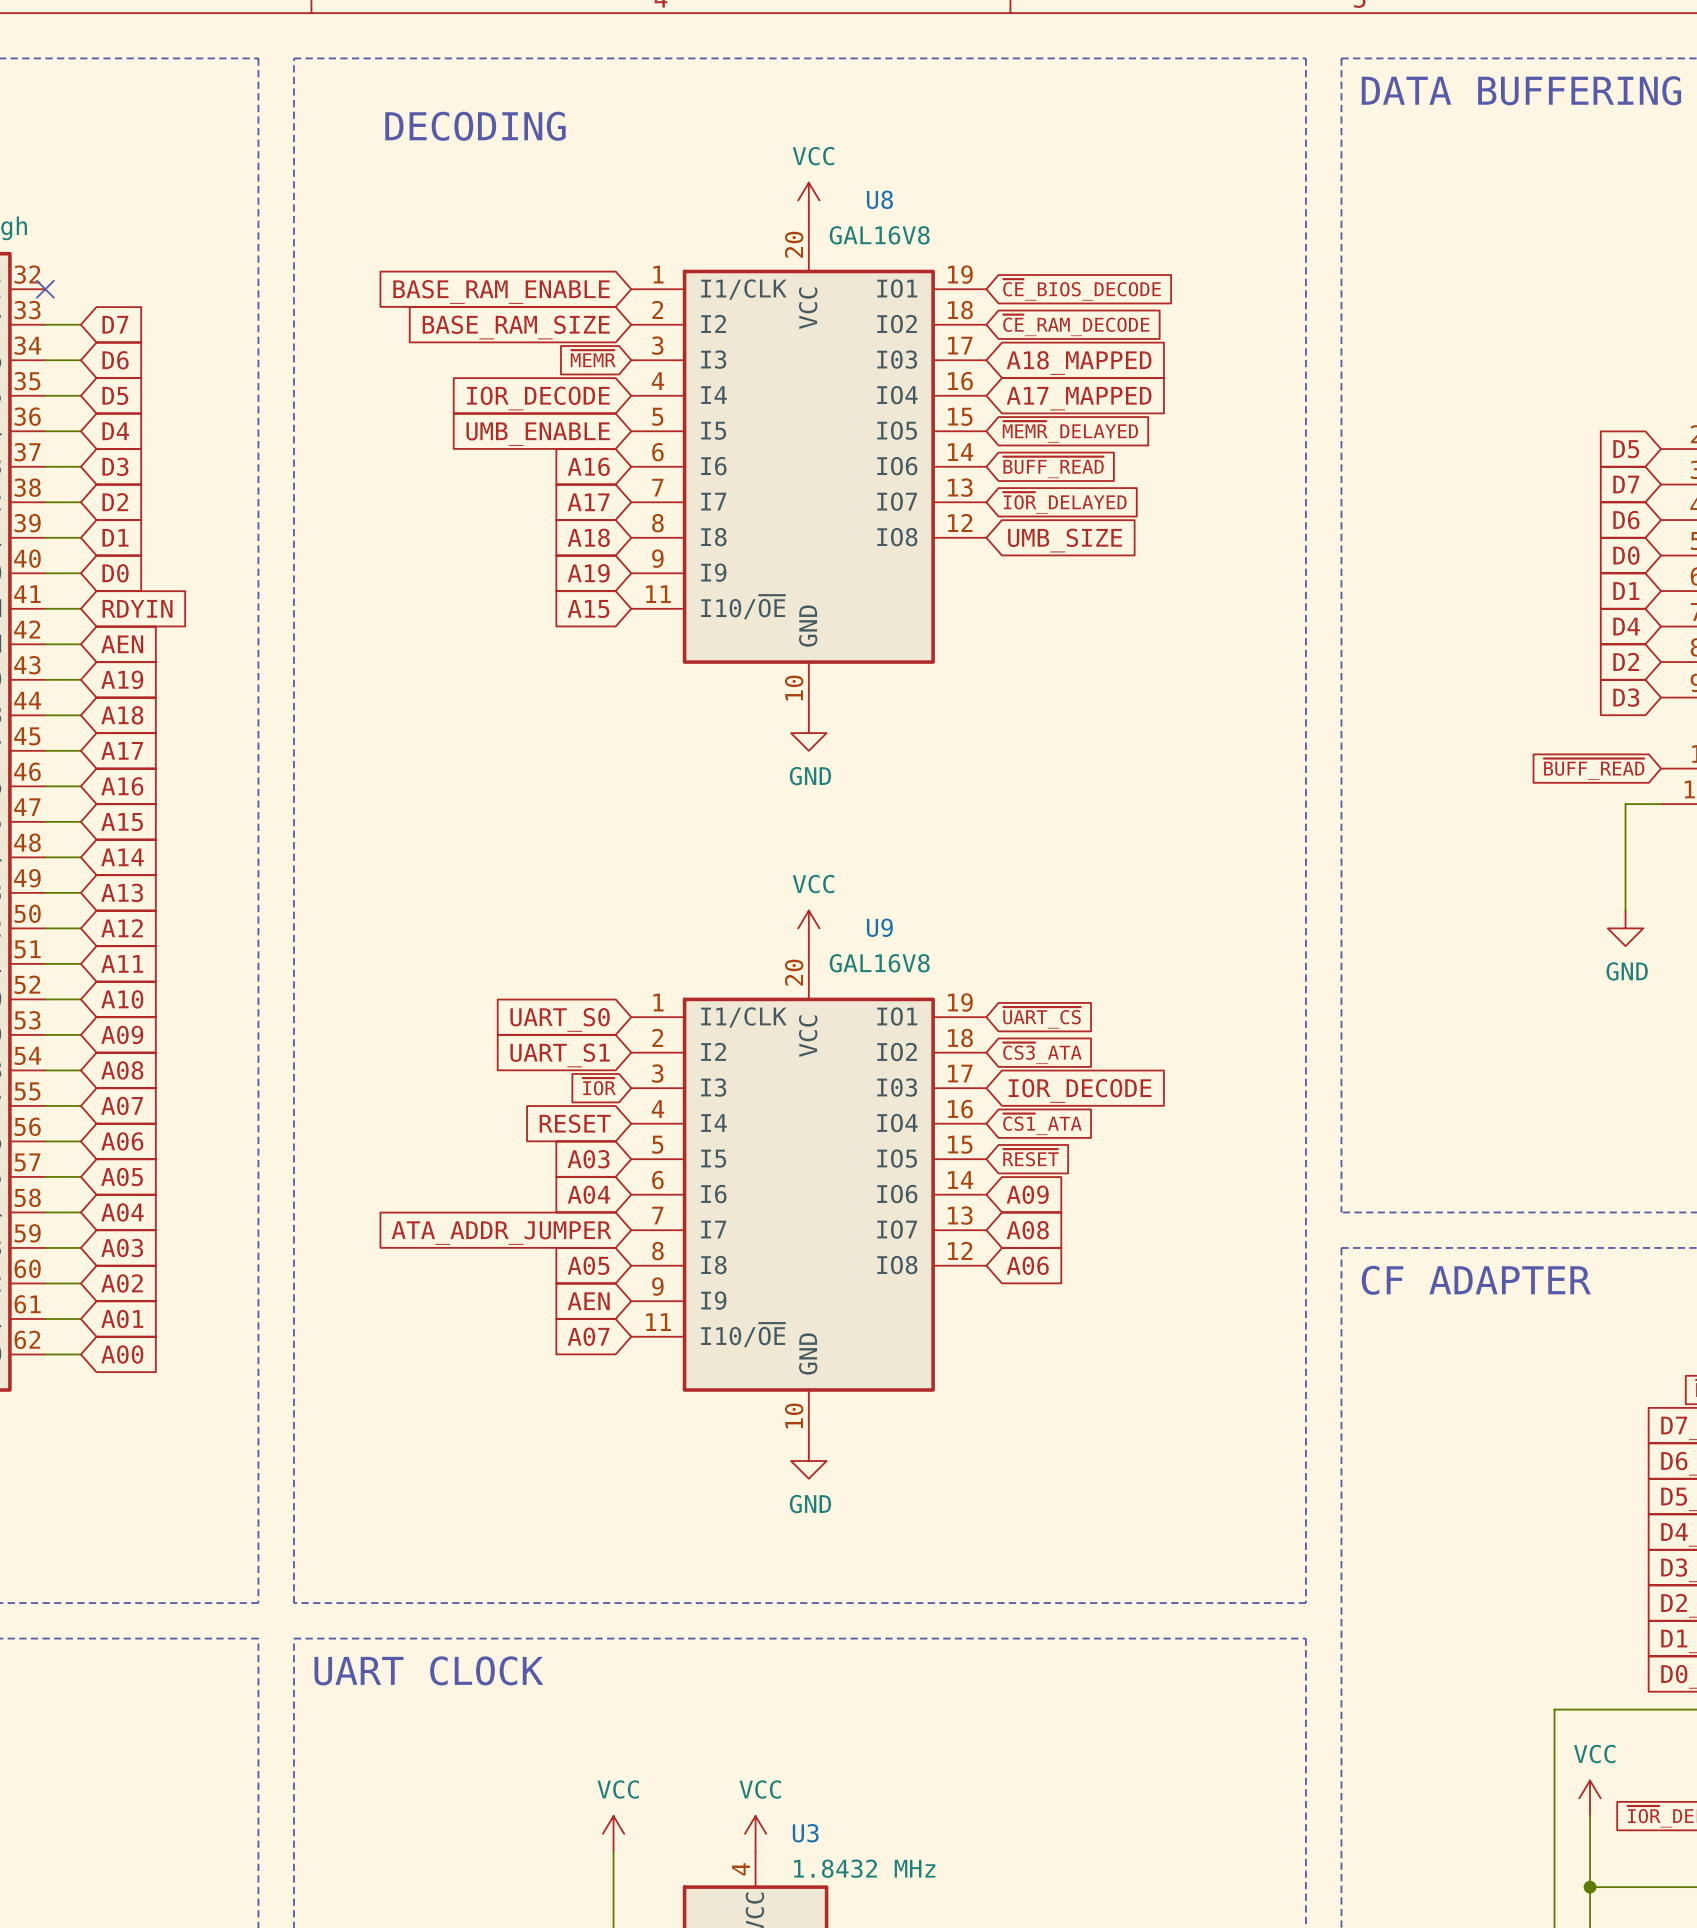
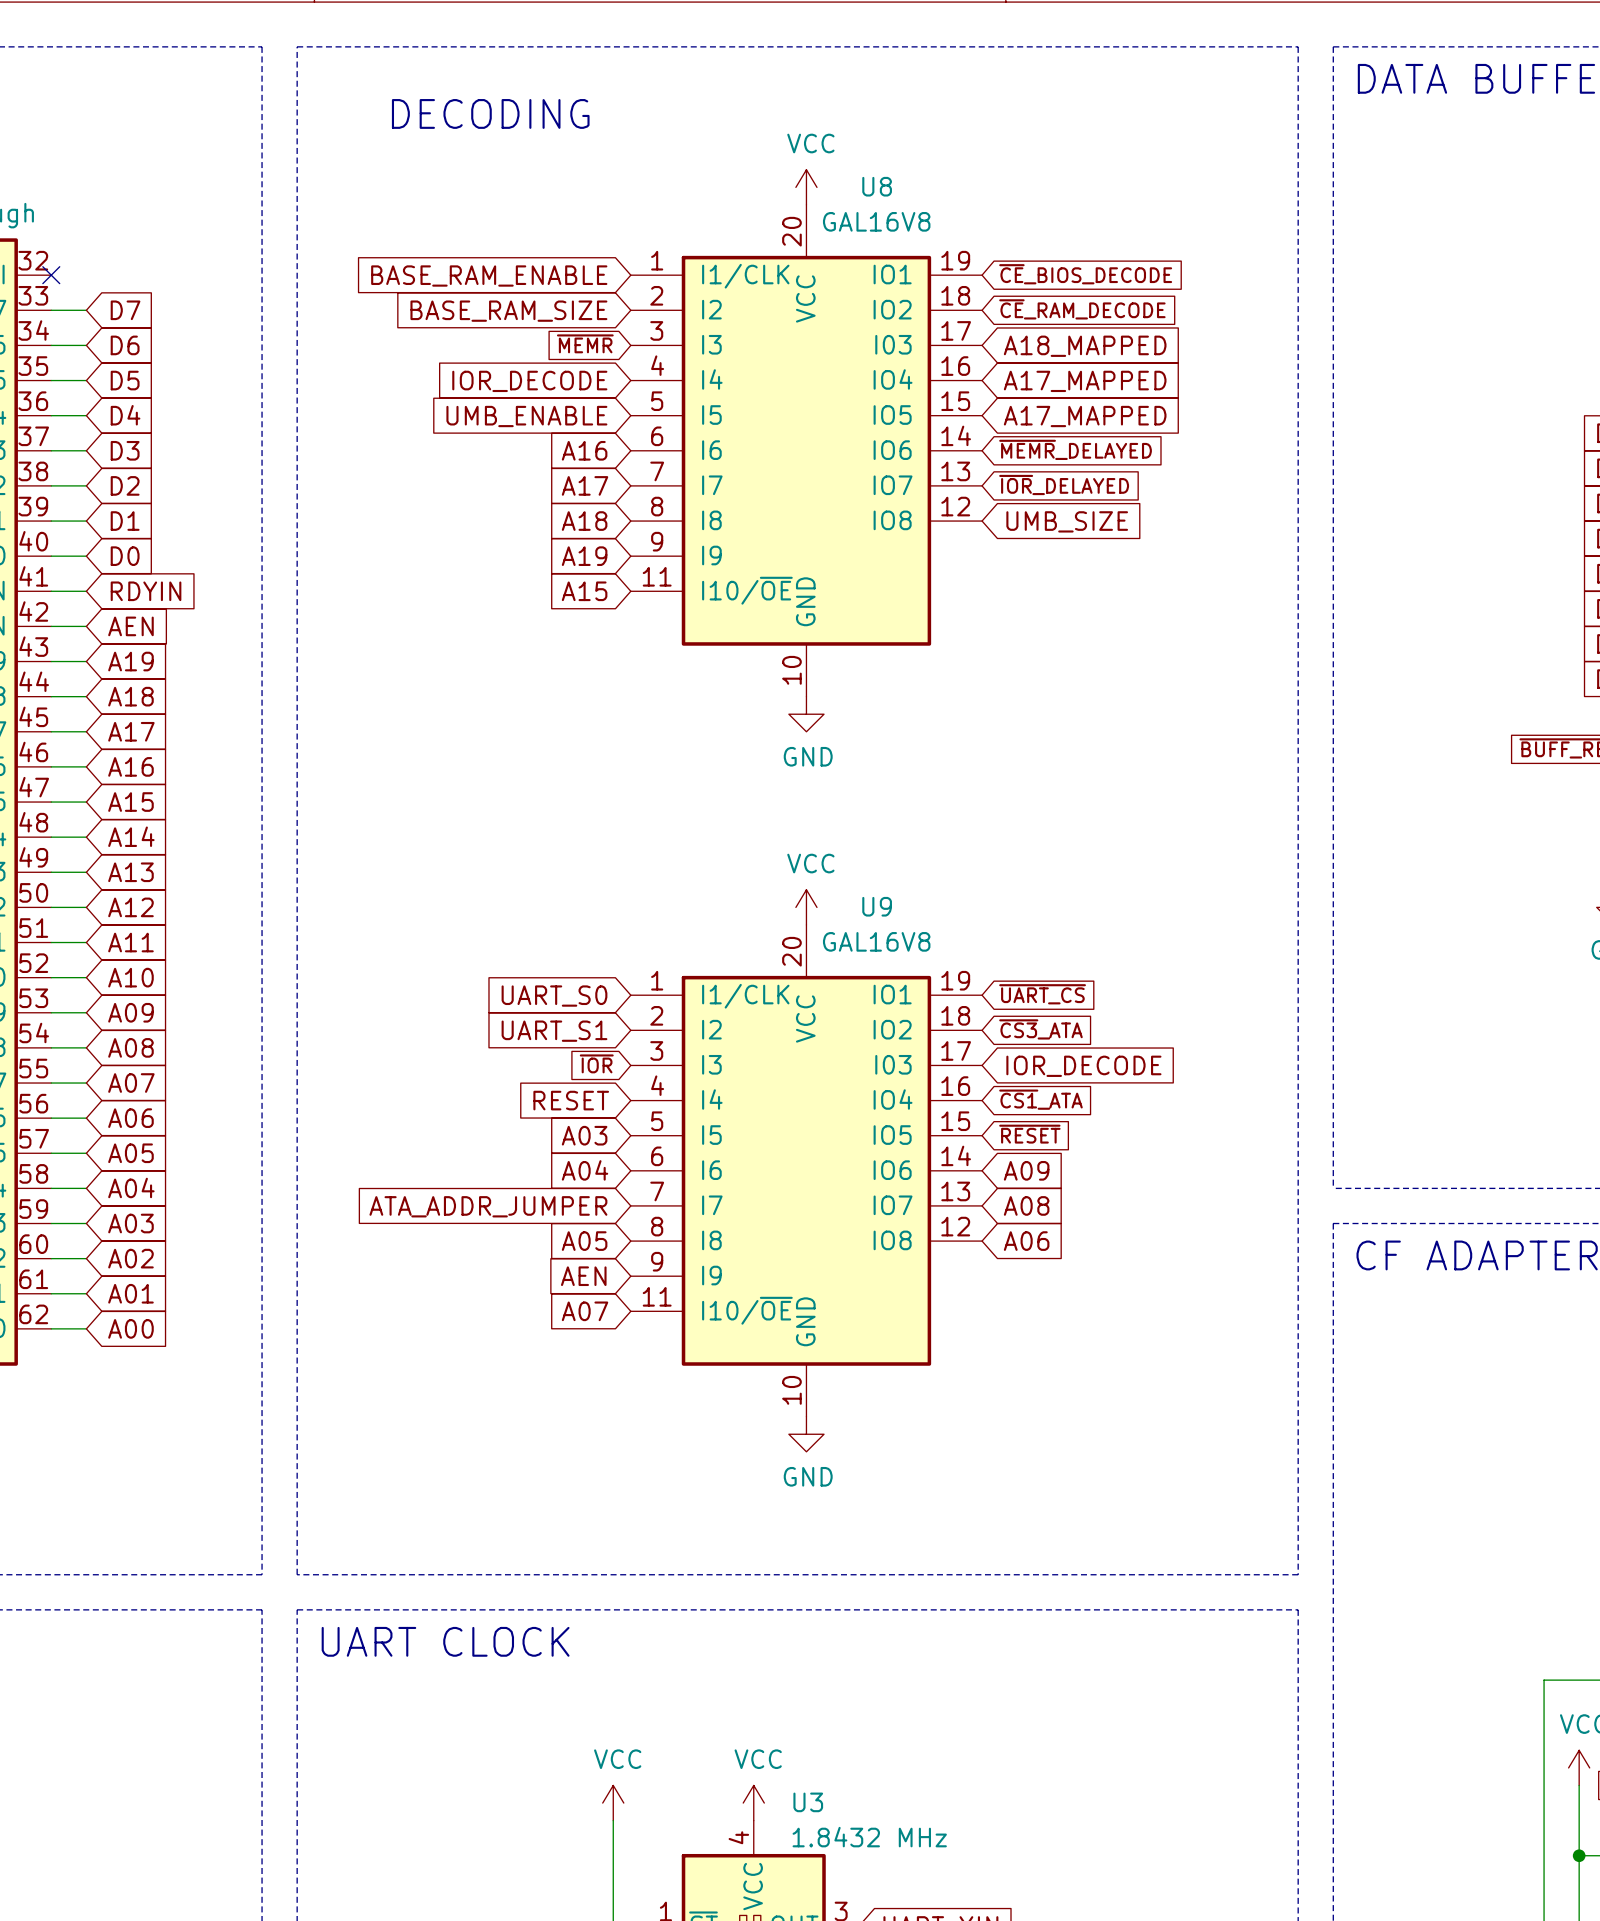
global label: ~{MEMR}_DELAYED (1070, 431) -> A17_MAPPED (1085, 416)
global label: ~{BUFF_READ} (1053, 467) -> ~{MEMR}_DELAYED (1075, 449)

